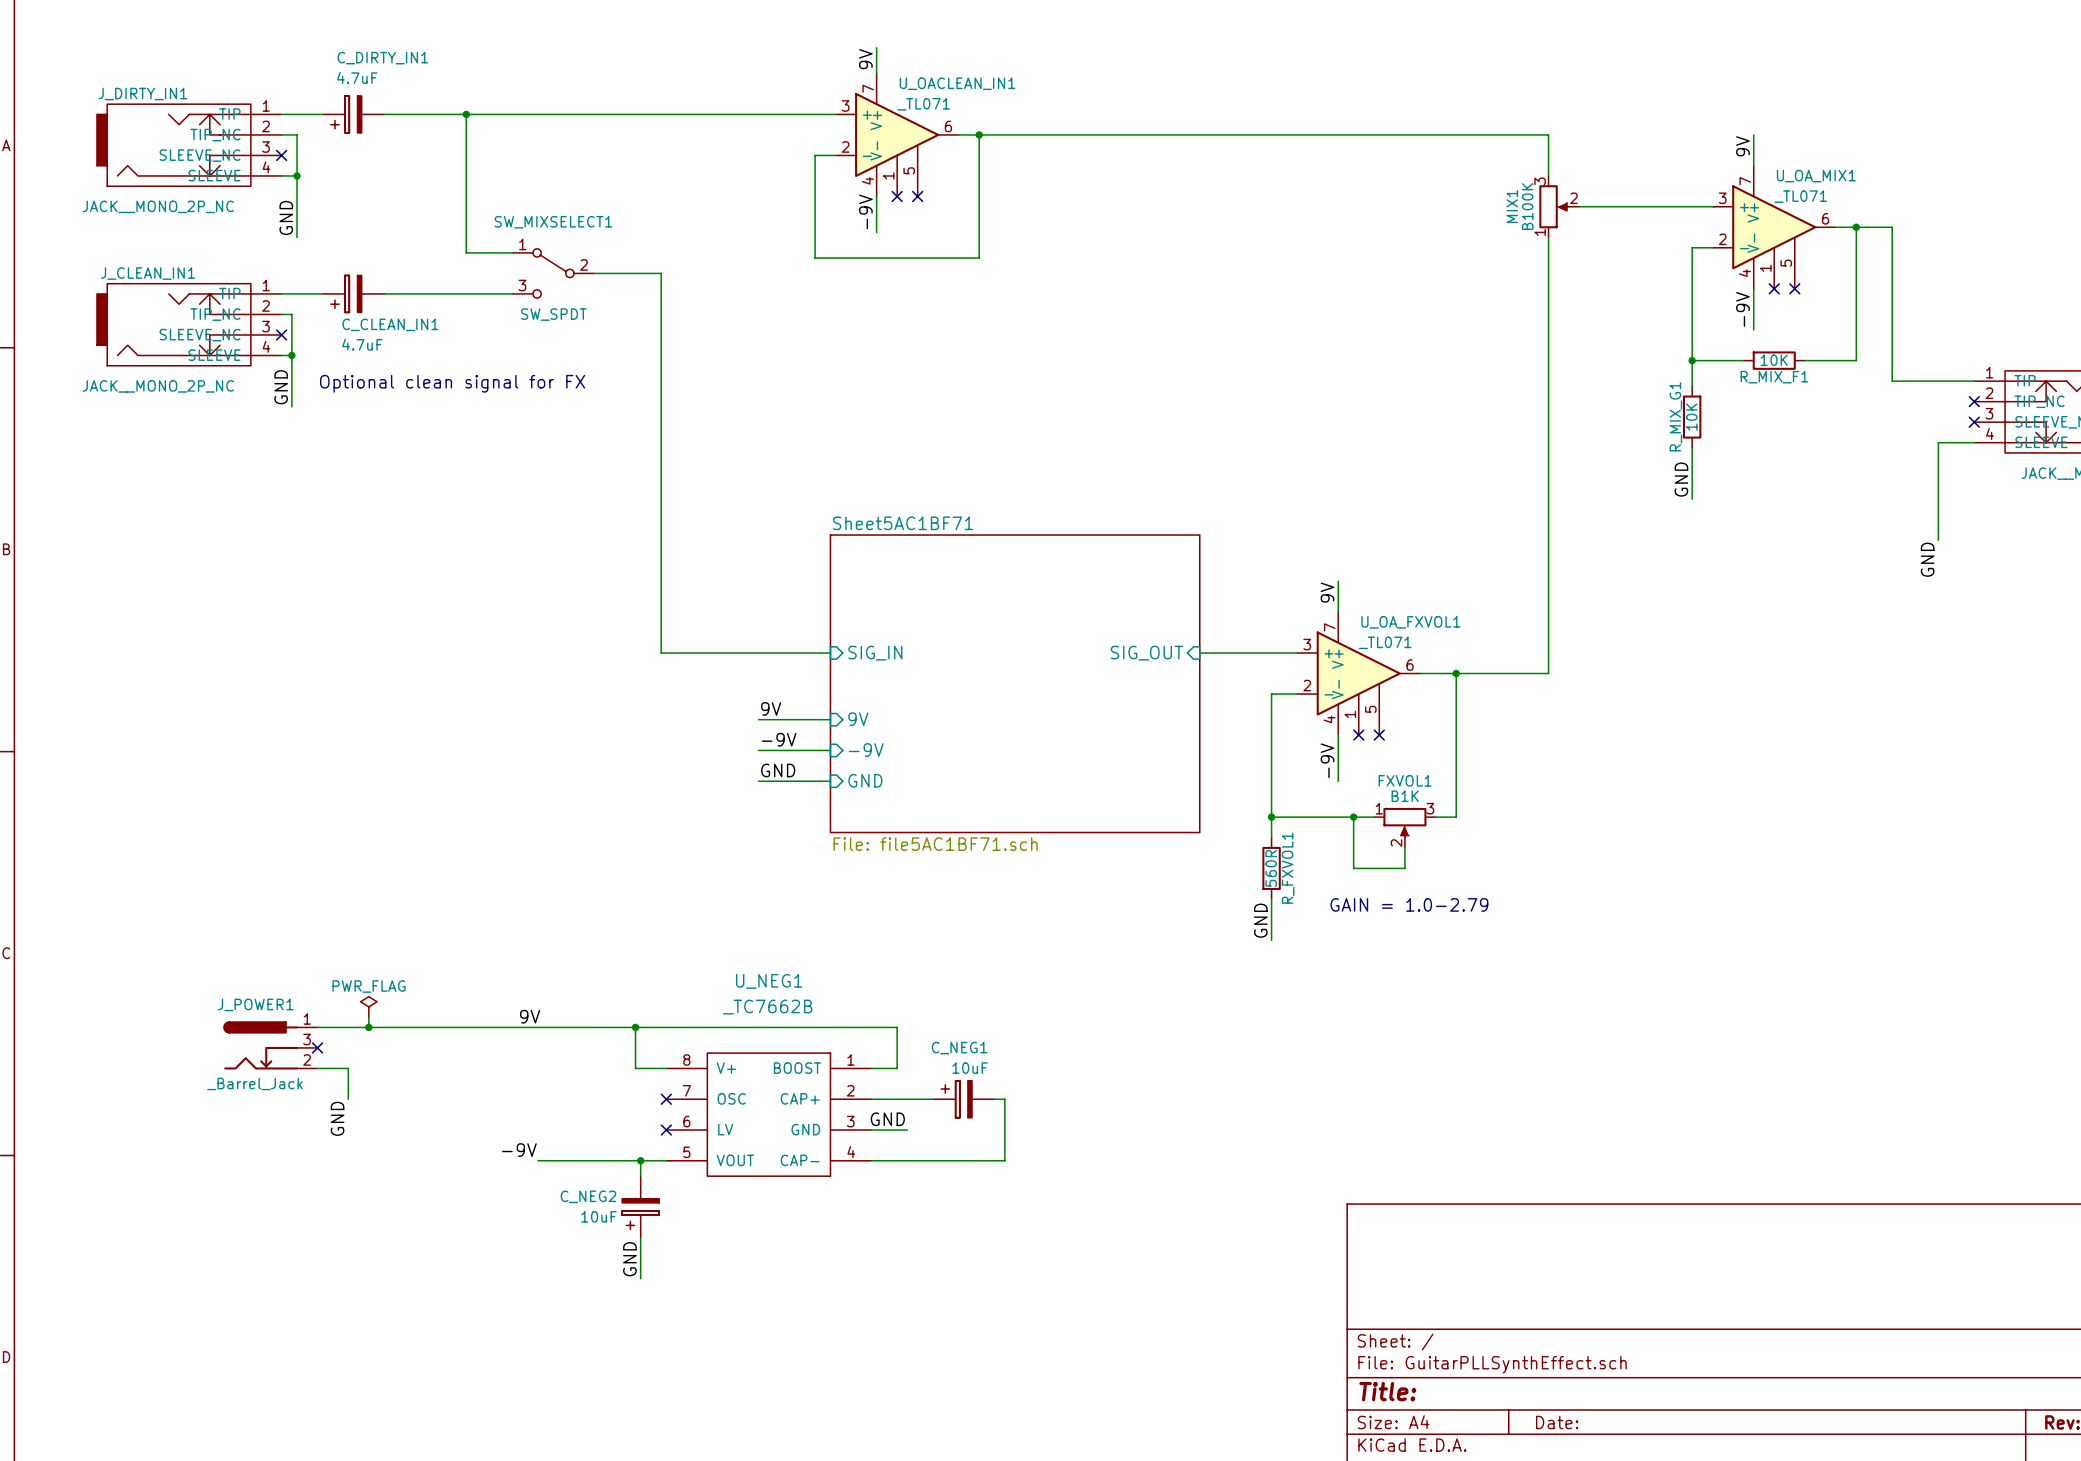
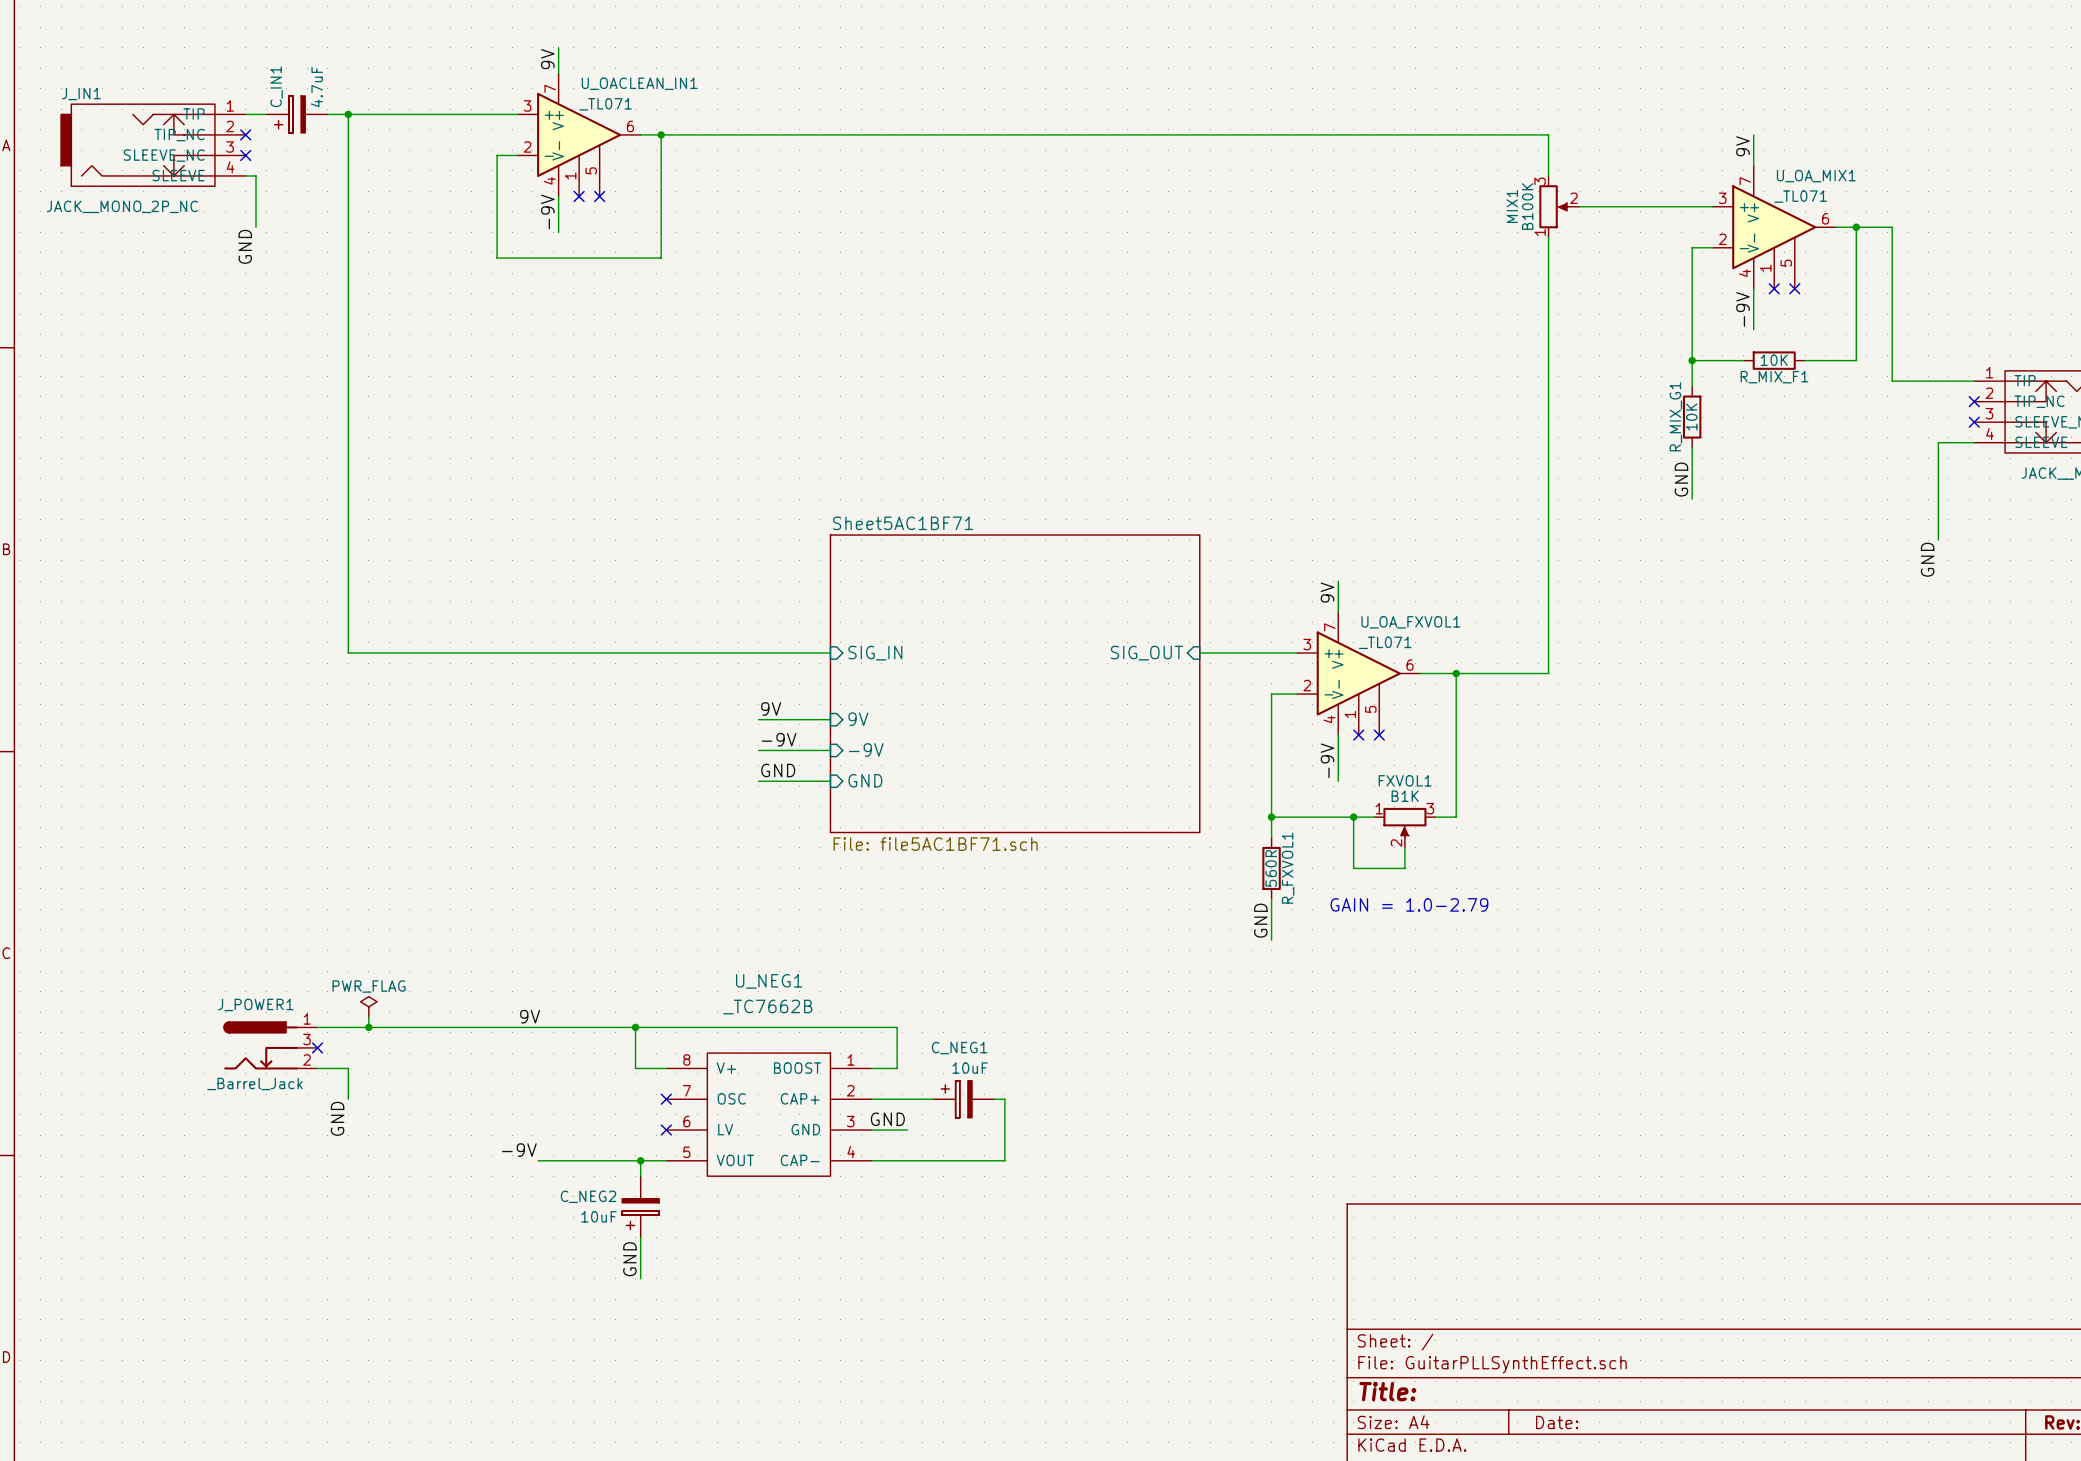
wire: none -> (558, 47) (558, 73)
wire: (876, 47) (876, 73) -> none
label: none -> 9V (547, 59)
label: 9V (865, 59) -> none
C_IN1: none -> 4.7uF (297, 114)
junction: none -> (348, 114)
C_DIRTY_IN1: 4.7uF (353, 114) -> none
wire: (466, 114) (466, 252) (512, 252) -> none
junction: (466, 114) -> none
wire: (517, 114) (835, 114) -> (640, 134) (958, 134)
no-connect mark: none -> (245, 134)
wire: (281, 134) (297, 134) (297, 237) -> none
wire: none -> (661, 134) (661, 258) (497, 258) (497, 155) (517, 155)
junction: none -> (661, 134)
U_OACLEAN_IN1 position: (897, 134) -> (579, 134)
wire: (979, 134) (979, 258) (815, 258) (815, 155) (835, 155) -> none
junction: (979, 134) -> none
J_IN1: none -> JACK__MONO_2P_NC (153, 145)
J_DIRTY_IN1: JACK__MONO_2P_NC (189, 145) -> none
no-connect mark: none -> (245, 155)
no-connect mark: (281, 155) -> none
wire: none -> (245, 175) (255, 175) (255, 227)
wire: (281, 175) (297, 175) -> none
junction: (297, 175) -> none
wire: none -> (558, 196) (558, 232)
no-connect mark: none -> (579, 196)
no-connect mark: none -> (599, 196)
wire: (876, 196) (876, 232) -> none
no-connect mark: (897, 196) -> none
no-connect mark: (917, 196) -> none
label: none -> -9V (547, 211)
label: -9V (865, 211) -> none
label position: GND (286, 217) -> GND (245, 246)
SW_MIXSELECT1: SW_SPDT (553, 273) -> none
wire: (594, 273) (661, 273) (661, 652) -> (348, 114) (348, 652) (661, 652)
wire: (281, 293) (322, 293) -> none
C_CLEAN_IN1: 4.7uF (353, 293) -> none
wire: (384, 293) (512, 293) -> none
wire: (281, 314) (291, 314) (291, 406) -> none
J_CLEAN_IN1: JACK__MONO_2P_NC (189, 324) -> none
no-connect mark: (281, 334) -> none
wire: (281, 355) (291, 355) -> none
junction: (291, 355) -> none
text: Optional clean signal for FX (452, 383) -> none
label: GND (281, 387) -> none

